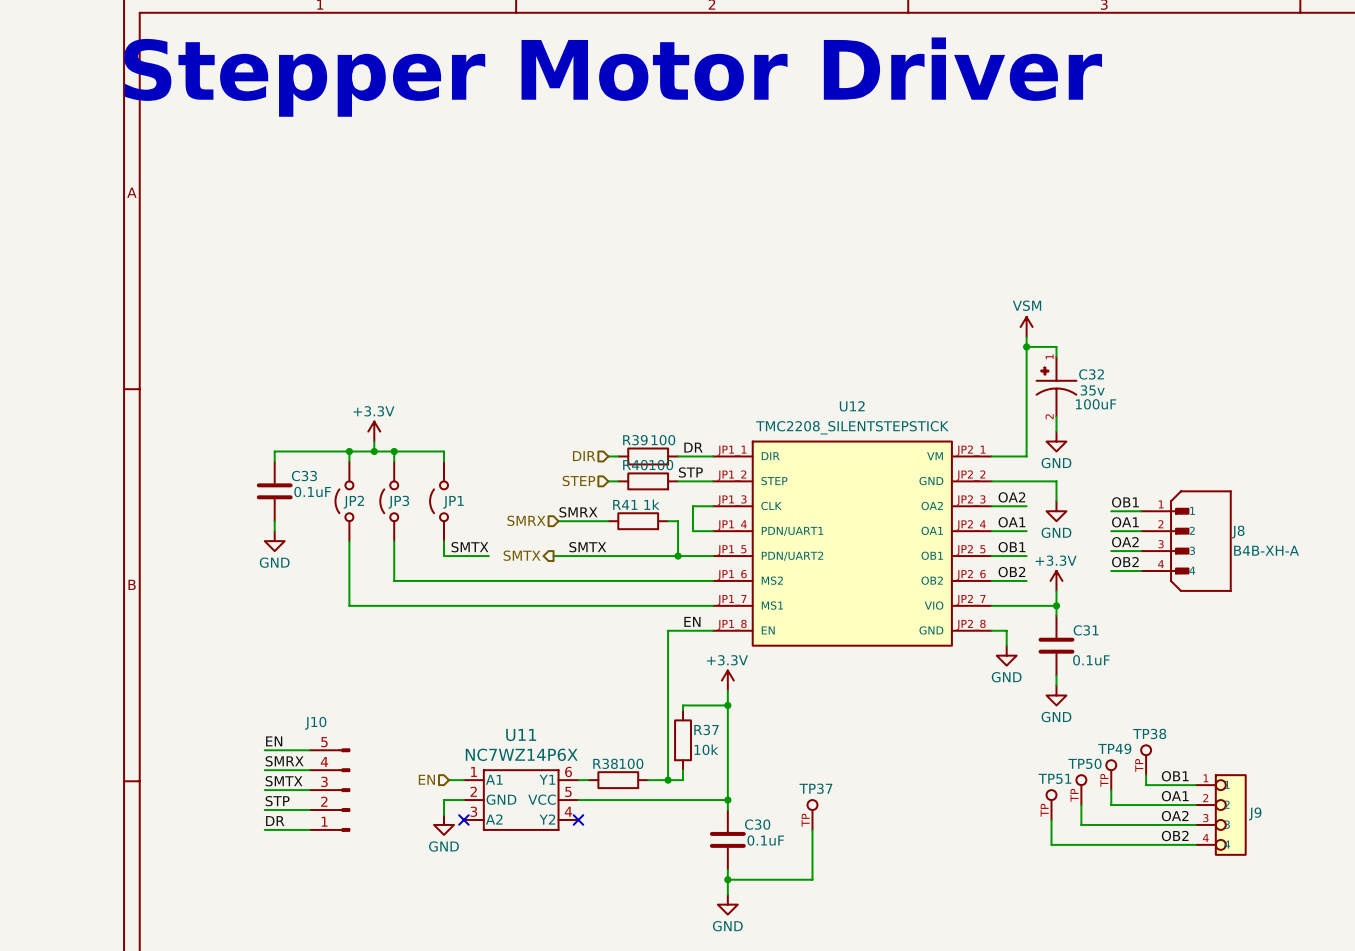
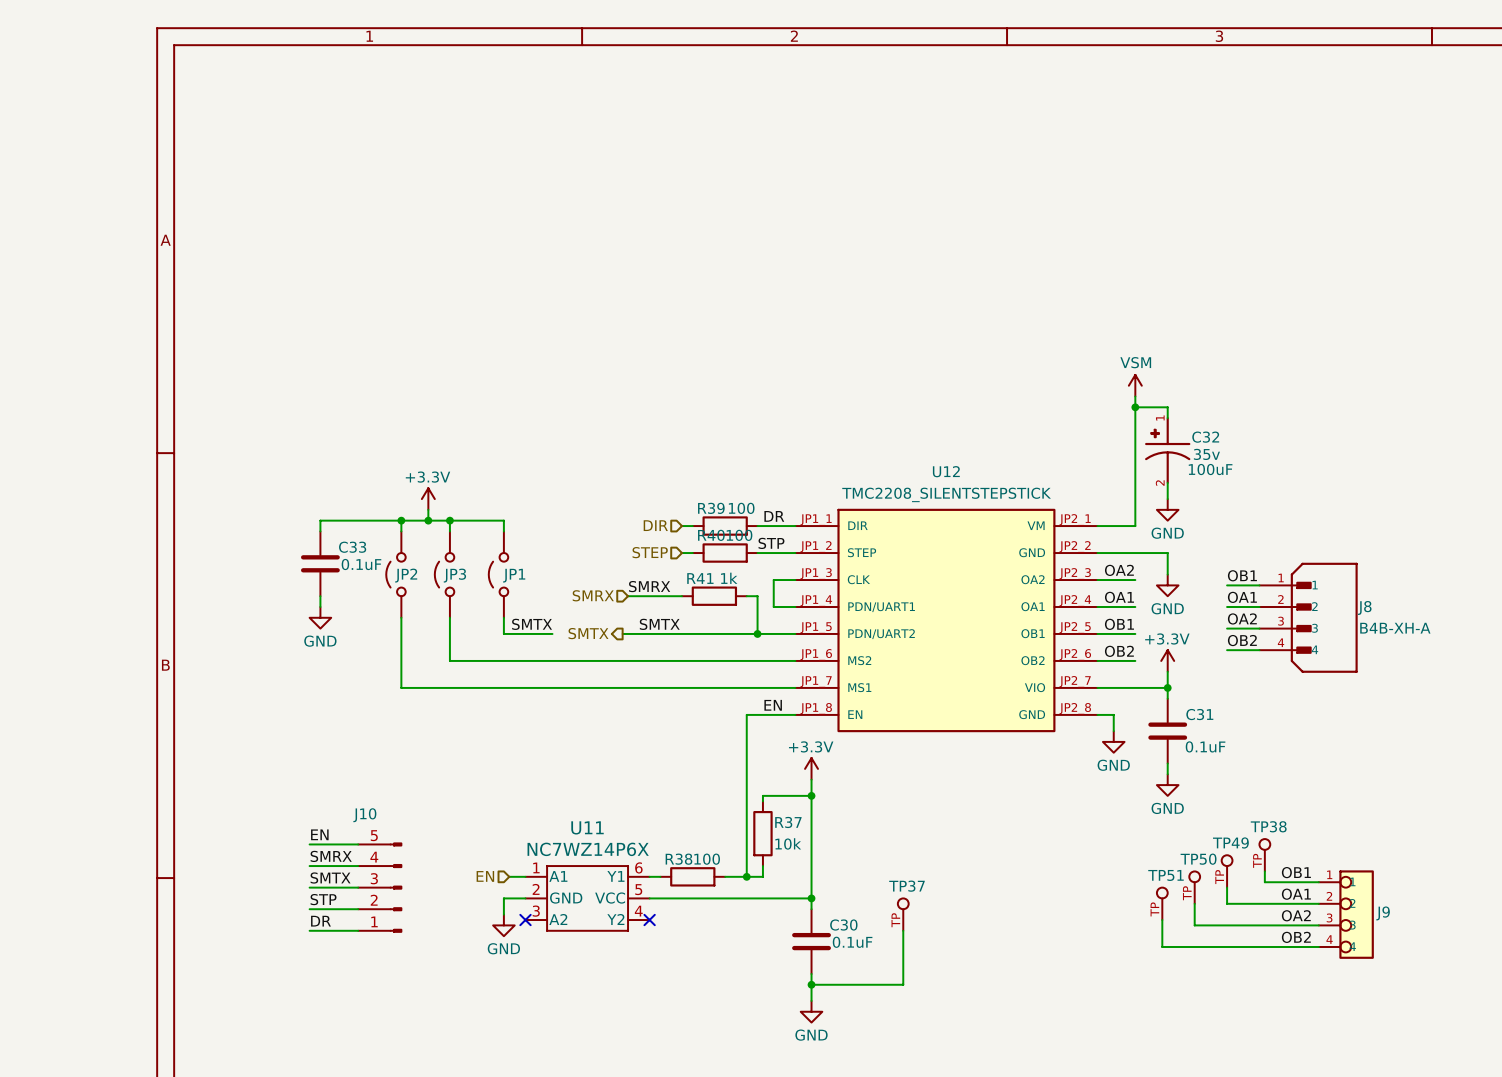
text: Stepper Motor Driver (613, 77) -> none

